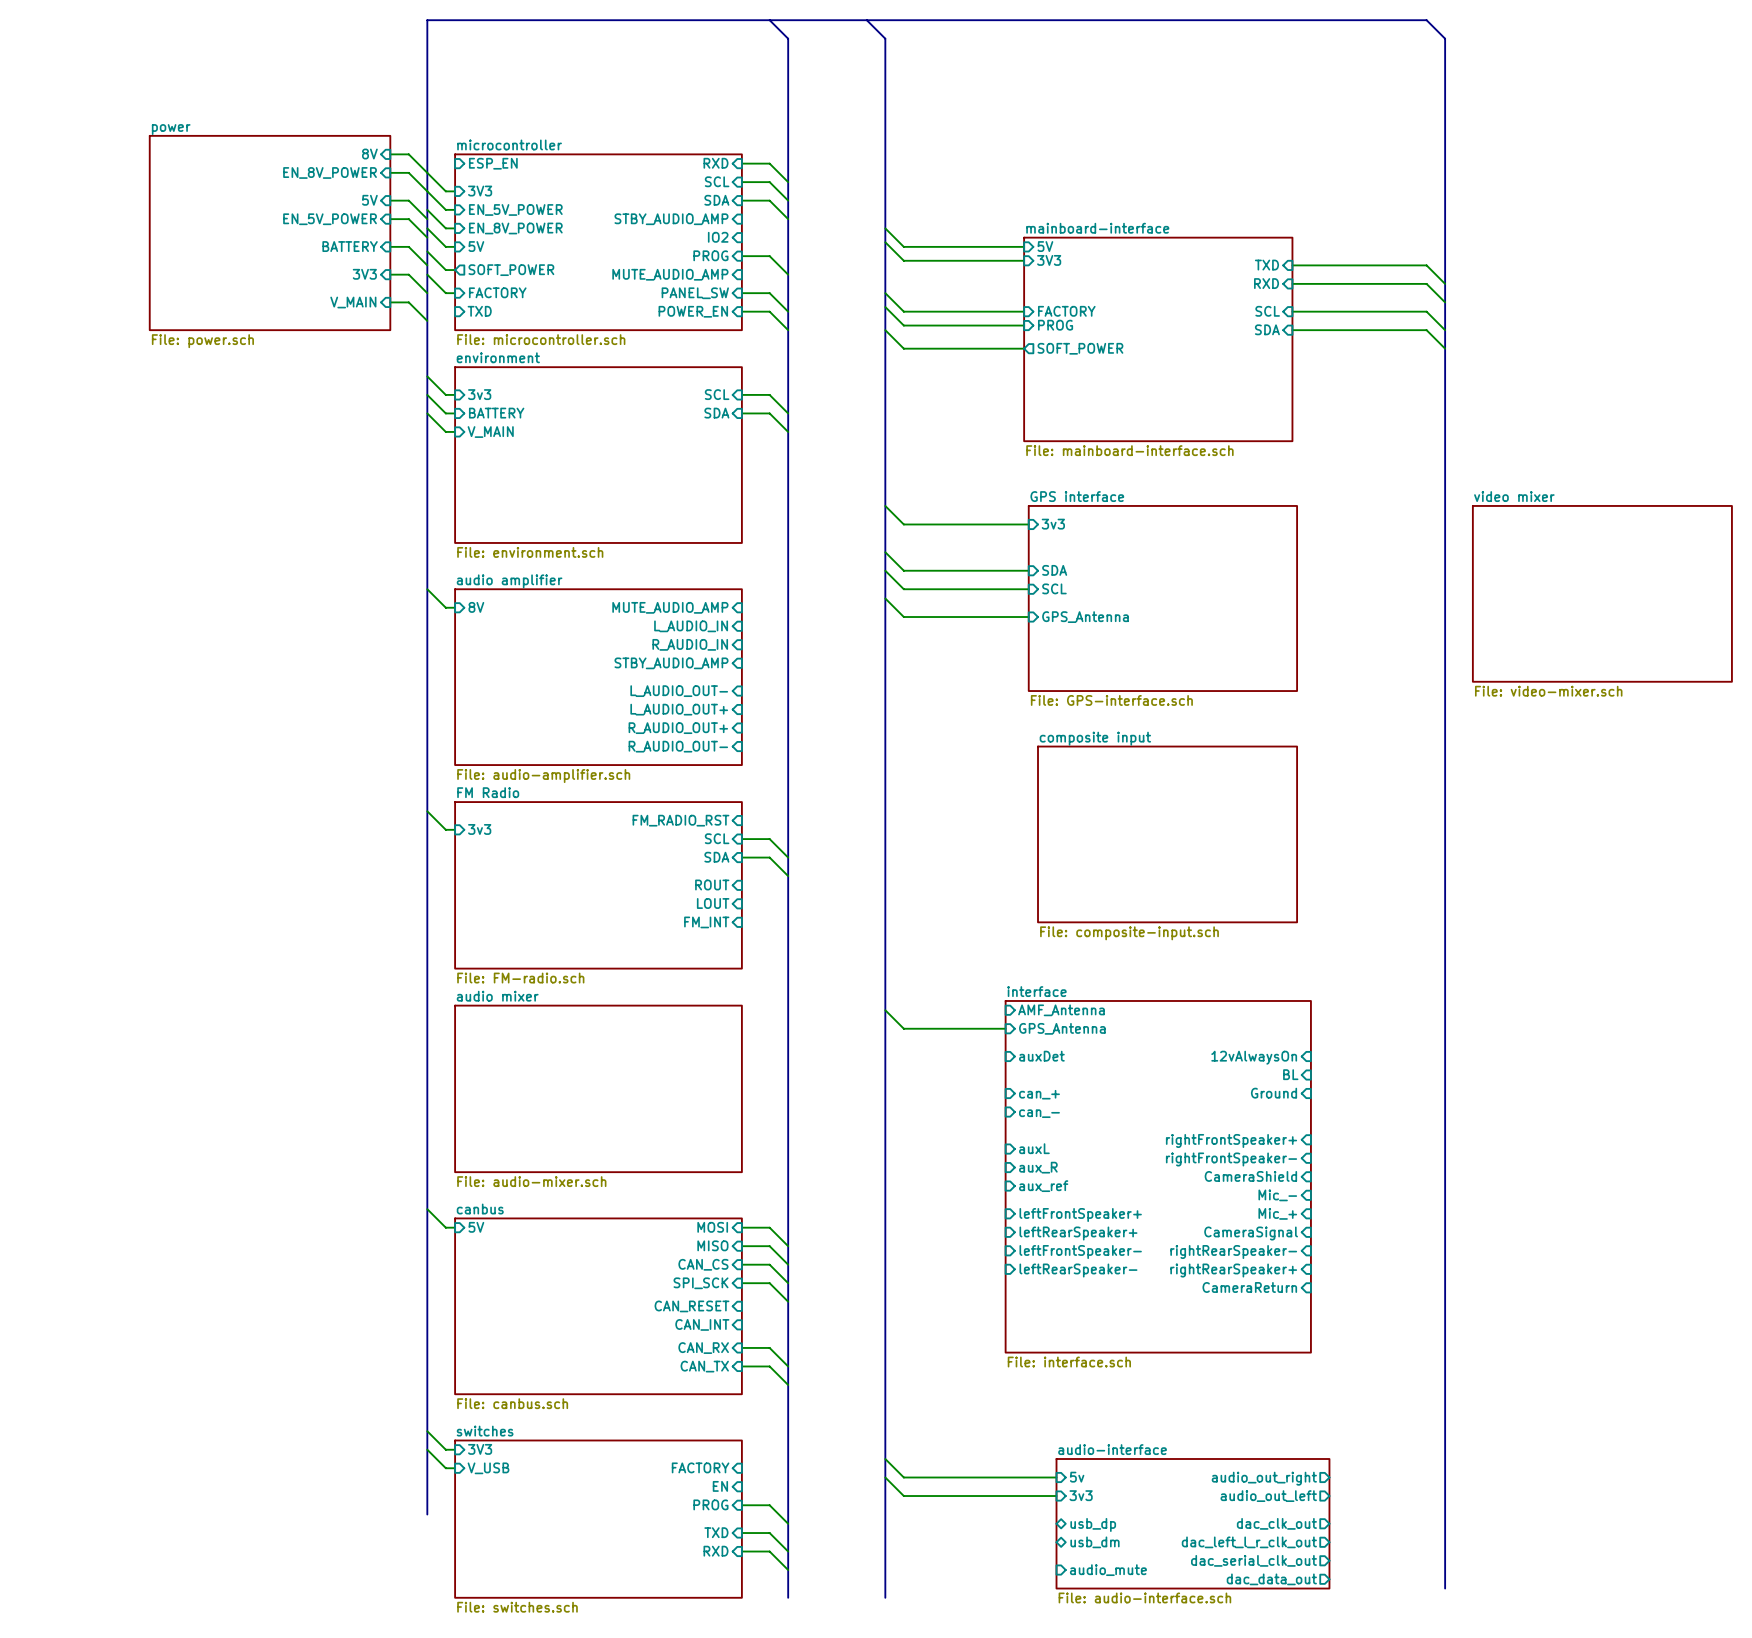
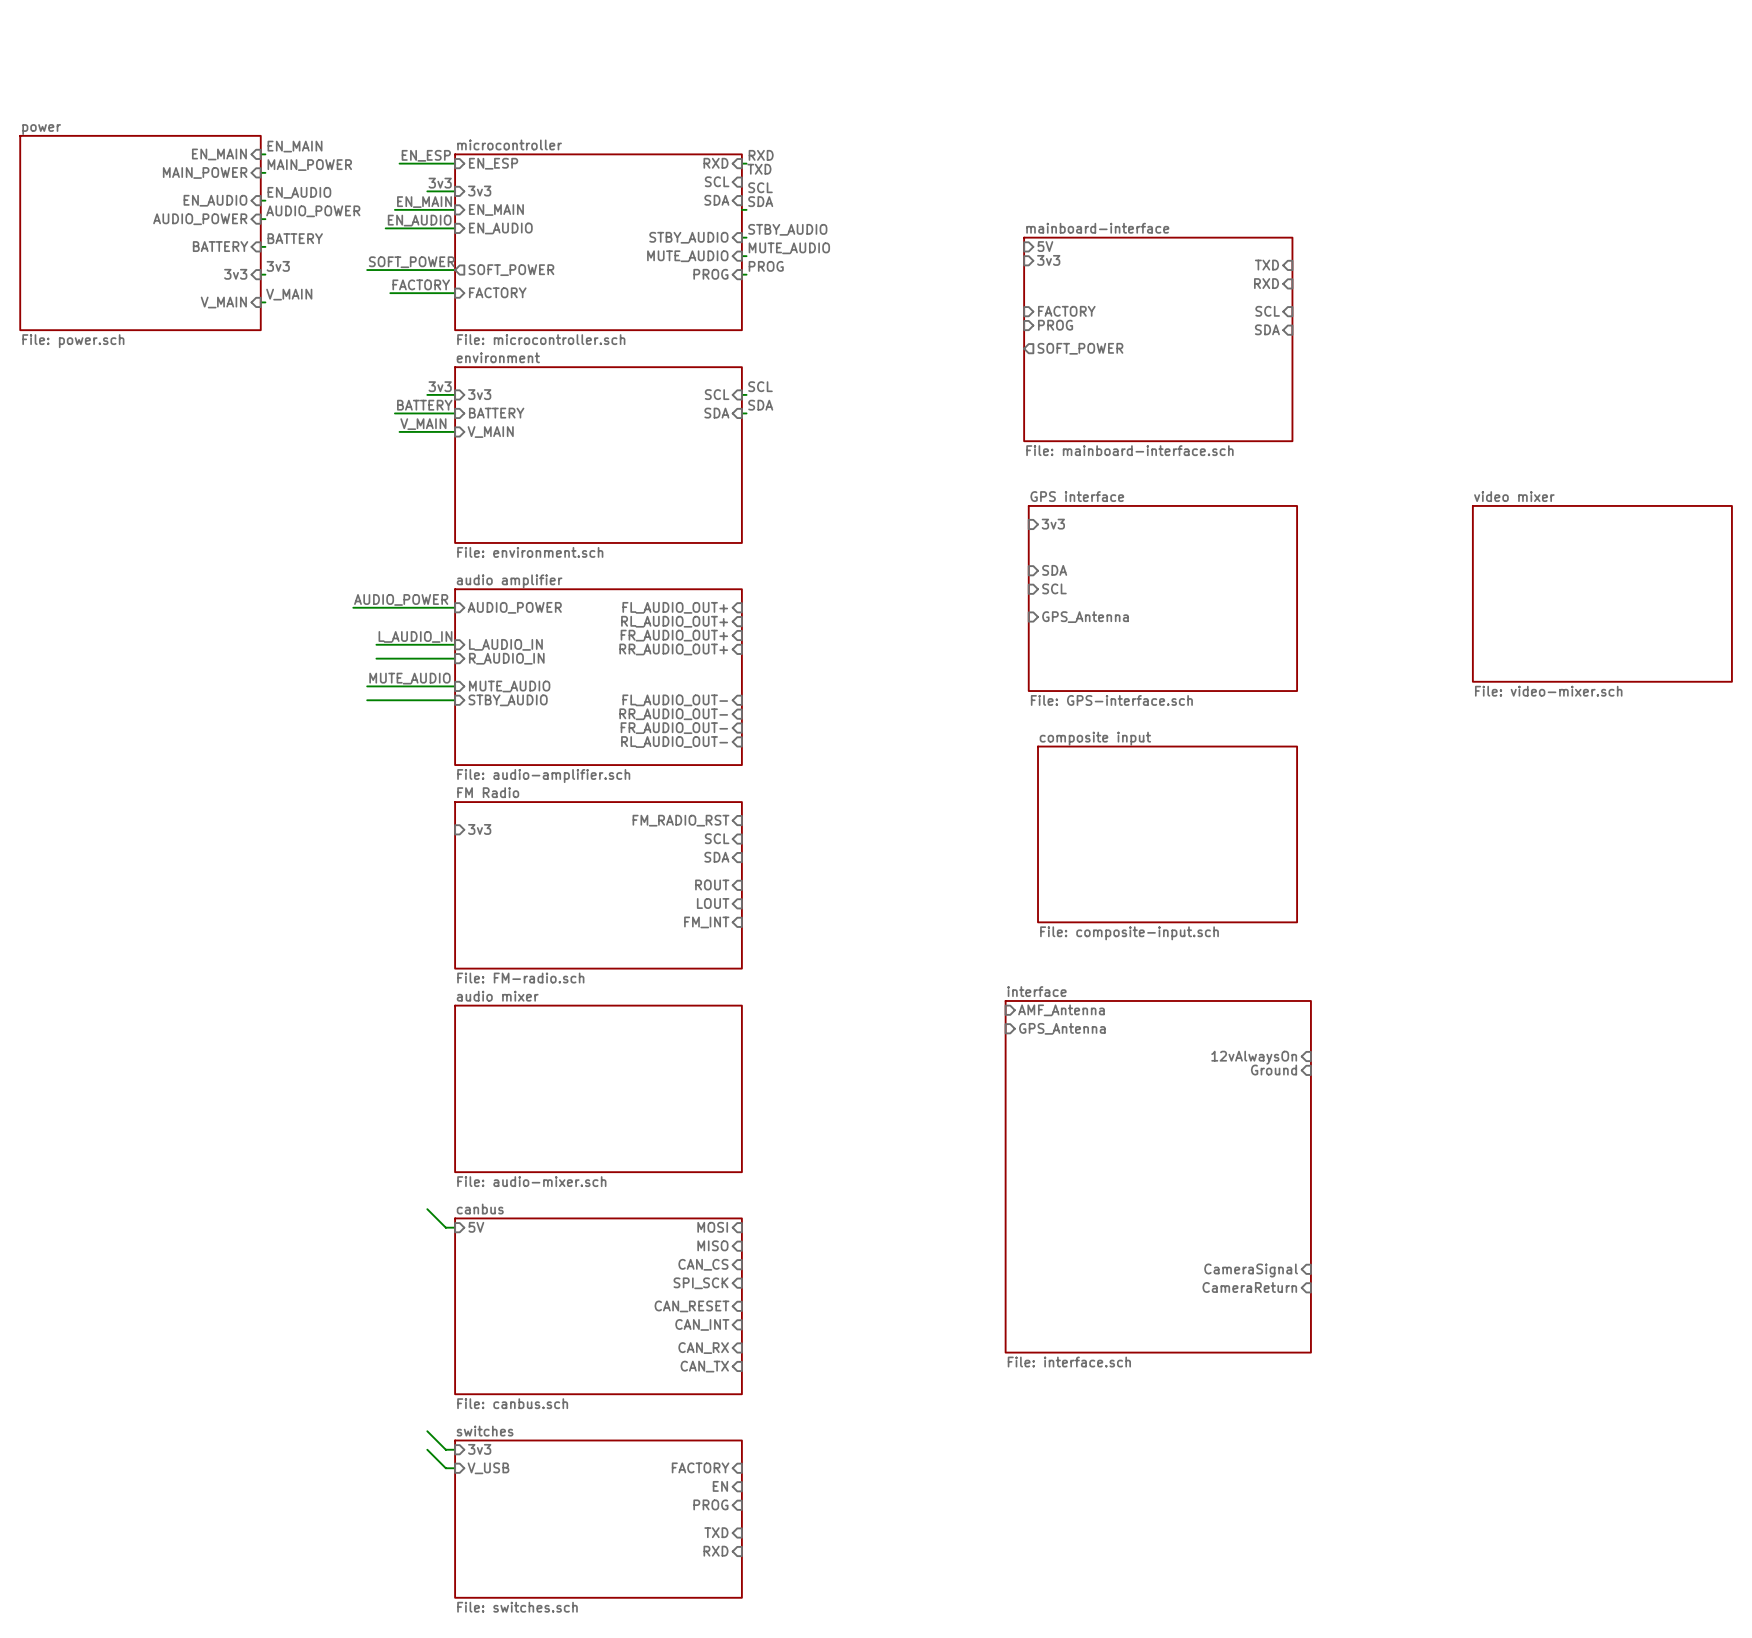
bus: (769, 20) (788, 38) (788, 1597) -> none
bus: (866, 20) (885, 38) (885, 1597) -> none
label: none -> EN_MAIN (294, 146)
sheet pin: none -> EN_MAIN (219, 154)
wire: none -> (260, 154) (265, 154)
sheet pin: 8V (369, 154) -> none
wire: (390, 154) (408, 154) (445, 191) -> (427, 191) (445, 191)
label: none -> EN_ESP (426, 155)
label: none -> RXD (761, 155)
wire: none -> (399, 163) (455, 163)
sheet pin: ESP_EN (493, 163) -> EN_ESP (493, 163)
wire: (746, 163) (769, 163) (788, 182) -> none
label: none -> MAIN_POWER (309, 165)
label: none -> TXD (759, 169)
sheet pin: none -> MAIN_POWER (205, 172)
wire: none -> (260, 172) (265, 172)
sheet pin: EN_8V_POWER (330, 172) -> none
wire: (390, 172) (408, 172) (445, 209) -> (394, 209) (445, 209)
wire: (741, 182) (769, 182) (788, 200) -> none
label: none -> 3v3 (440, 183)
label: none -> SCL (760, 187)
sheet pin: 3V3 (480, 191) -> 3v3 (479, 191)
label: none -> EN_AUDIO (299, 192)
sheet pin: none -> EN_AUDIO (215, 200)
wire: none -> (260, 200) (265, 200)
sheet pin: 5V (369, 200) -> none
wire: (390, 200) (408, 200) (427, 219) -> none
wire: (741, 200) (769, 200) (788, 219) -> none
label: none -> SDA (760, 201)
label: none -> EN_MAIN (424, 202)
wire: (427, 209) (445, 228) -> (385, 228) (445, 228)
sheet pin: EN_5V_POWER (515, 209) -> EN_MAIN (496, 209)
wire: none -> (741, 209) (746, 209)
label: none -> AUDIO_POWER (313, 211)
sheet pin: none -> AUDIO_POWER (200, 219)
wire: none -> (260, 219) (265, 219)
sheet pin: EN_5V_POWER (330, 219) -> none
wire: (390, 219) (408, 219) (427, 237) -> none
sheet pin: STBY_AUDIO_AMP (671, 219) -> none
label: none -> EN_AUDIO (419, 220)
wire: (427, 228) (445, 246) (455, 246) -> none
sheet pin: EN_8V_POWER (515, 228) -> EN_AUDIO (500, 228)
wire: (885, 228) (903, 246) (1024, 246) -> none
label: none -> STBY_AUDIO (787, 229)
sheet power position: (270, 233) -> (140, 233)
sheet pin: IO2 (718, 237) -> STBY_AUDIO (688, 237)
wire: none -> (741, 237) (746, 237)
label: none -> BATTERY (295, 238)
wire: (885, 242) (903, 260) (1024, 260) -> none
wire: none -> (260, 246) (265, 246)
sheet pin position: BATTERY (350, 246) -> BATTERY (220, 246)
wire: (390, 246) (408, 246) (427, 265) -> none
sheet pin: 5V (476, 246) -> none
label: none -> MUTE_AUDIO (789, 248)
wire: (427, 251) (445, 270) -> (367, 270) (445, 270)
sheet pin: PROG (710, 255) -> MUTE_AUDIO (687, 256)
wire: (746, 256) (769, 256) (788, 274) -> none
sheet pin: 3V3 (1049, 260) -> 3v3 (1048, 260)
label: none -> SOFT_POWER (411, 262)
wire: (1292, 265) (1426, 265) (1445, 283) -> none
label: none -> 3v3 (278, 266)
label: none -> PROG (766, 266)
sheet pin: none -> 3v3 (235, 274)
wire: none -> (260, 274) (265, 274)
sheet pin: 3V3 (364, 274) -> none
wire: (390, 274) (408, 274) (427, 293) -> none
wire: (427, 274) (445, 293) -> (390, 293) (445, 293)
sheet pin: MUTE_AUDIO_AMP (670, 274) -> PROG (710, 274)
wire: none -> (741, 274) (746, 274)
wire: (1292, 283) (1426, 283) (1445, 302) -> none
label: none -> FACTORY (421, 284)
sheet pin: PANEL_SW (695, 293) -> none
wire: (741, 293) (769, 293) (788, 311) -> none
wire: (885, 293) (903, 311) (1024, 311) -> none
label: none -> V_MAIN (289, 294)
wire: none -> (260, 302) (265, 302)
sheet pin position: V_MAIN (353, 302) -> V_MAIN (223, 302)
wire: (390, 302) (408, 302) (427, 320) -> none
wire: (885, 307) (903, 325) (1024, 325) -> none
sheet pin: TXD (479, 311) -> none
sheet pin: POWER_EN (693, 311) -> none
wire: (741, 311) (769, 311) (788, 330) -> none
wire: (1292, 311) (1426, 311) (1445, 330) -> none
wire: (885, 330) (903, 348) (1024, 348) -> none
wire: (1292, 330) (1426, 330) (1445, 348) -> none
wire: (427, 376) (445, 394) -> (427, 394) (445, 394)
label: none -> 3v3 (440, 386)
label: none -> SCL (760, 386)
wire: (427, 394) (445, 413) -> (394, 413) (445, 413)
wire: (746, 394) (769, 394) (788, 413) -> none
label: none -> BATTERY (424, 405)
label: none -> SDA (760, 405)
wire: (427, 413) (445, 431) -> (399, 431) (445, 431)
wire: (746, 413) (769, 413) (788, 431) -> none
label: none -> V_MAIN (423, 424)
wire: (885, 505) (903, 524) (1028, 524) -> none
wire: (885, 552) (903, 570) (1028, 570) -> none
wire: (885, 570) (903, 589) (1028, 589) -> none
wire: (427, 589) (445, 607) -> (353, 607) (445, 607)
wire: (885, 598) (903, 617) (1028, 617) -> none
label: none -> AUDIO_POWER (401, 599)
sheet pin: 8V (476, 607) -> AUDIO_POWER (514, 607)
sheet pin: MUTE_AUDIO_AMP (670, 607) -> FL_AUDIO_OUT+ (675, 607)
sheet pin: none -> RL_AUDIO_OUT+ (674, 621)
sheet pin: L_AUDIO_IN (691, 626) -> none
sheet pin: none -> FR_AUDIO_OUT+ (674, 635)
label: none -> L_AUDIO_IN (415, 636)
wire: none -> (376, 644) (455, 644)
sheet pin: none -> L_AUDIO_IN (505, 644)
sheet pin: R_AUDIO_IN (690, 644) -> none
sheet pin: none -> RR_AUDIO_OUT+ (673, 649)
wire: none -> (376, 658) (455, 658)
sheet pin: none -> R_AUDIO_IN (506, 658)
sheet pin: STBY_AUDIO_AMP (671, 663) -> none
label: none -> MUTE_AUDIO (409, 678)
wire: none -> (367, 686) (455, 686)
sheet pin: none -> MUTE_AUDIO (509, 686)
sheet pin: L_AUDIO_OUT- (679, 691) -> none
wire: none -> (367, 700) (455, 700)
sheet pin: none -> STBY_AUDIO (508, 700)
sheet pin: none -> FL_AUDIO_OUT- (675, 700)
sheet pin: L_AUDIO_OUT+ (679, 709) -> none
sheet pin: none -> RR_AUDIO_OUT- (673, 714)
sheet pin: R_AUDIO_OUT+ (678, 728) -> FR_AUDIO_OUT- (674, 728)
sheet pin: R_AUDIO_OUT- (678, 746) -> RL_AUDIO_OUT- (674, 742)
wire: (427, 811) (445, 829) (455, 829) -> none
wire: (741, 839) (769, 839) (788, 857) -> none
wire: (741, 857) (769, 857) (788, 876) -> none
wire: (885, 1010) (903, 1028) (1005, 1028) -> none
sheet pin: auxDet (1041, 1056) -> none
sheet pin: BL (1290, 1074) -> none
sheet pin position: Ground (1274, 1093) -> Ground (1274, 1070)
sheet pin: can_+ (1039, 1094) -> none
sheet pin: can_- (1039, 1113) -> none
sheet pin: rightFrontSpeaker+ (1231, 1140) -> none
sheet pin: auxL (1034, 1148) -> none
sheet pin: rightFrontSpeaker- (1231, 1159) -> none
sheet pin: aux_R (1038, 1167) -> none
sheet pin: CameraShield (1250, 1176) -> none
sheet pin: aux_ref (1043, 1186) -> none
sheet pin: Mic_- (1277, 1195) -> none
sheet pin: Mic_+ (1277, 1213) -> none
sheet pin: leftFrontSpeaker+ (1080, 1215) -> none
wire: (741, 1227) (769, 1227) (788, 1246) -> none
sheet pin: leftRearSpeaker+ (1078, 1233) -> none
sheet pin: CameraSignal (1251, 1233) -> none
wire: (741, 1246) (769, 1246) (788, 1264) -> none
sheet pin: leftFrontSpeaker- (1080, 1252) -> none
sheet pin: rightRearSpeaker- (1233, 1252) -> none
wire: (741, 1264) (769, 1264) (788, 1283) -> none
sheet pin: leftRearSpeaker- (1078, 1270) -> none
sheet pin: rightRearSpeaker+ (1233, 1270) -> CameraSignal (1251, 1270)
wire: (741, 1283) (769, 1283) (788, 1301) -> none
wire: (741, 1347) (769, 1347) (788, 1366) -> none
wire: (741, 1366) (769, 1366) (788, 1384) -> none
sheet pin: 3V3 (480, 1449) -> 3v3 (479, 1449)
wire: (885, 1459) (903, 1477) (1056, 1477) -> none
wire: (885, 1477) (903, 1496) (1056, 1496) -> none
sheet pin: 5v (1077, 1477) -> none
sheet pin: audio_out_right (1264, 1478) -> none
sheet pin: 3v3 (1081, 1495) -> none
sheet pin: audio_out_left (1268, 1496) -> none
wire: (741, 1505) (769, 1505) (788, 1523) -> none
bus: (427, 1514) (427, 20) (1426, 20) (1445, 38) (1445, 1588) -> none
sheet audio-interface: File: audio-interface.sch (1192, 1523) -> none
sheet pin: dac_clk_out (1276, 1523) -> none
sheet pin: usb_dp (1093, 1524) -> none
wire: (741, 1533) (769, 1533) (788, 1551) -> none
sheet pin: usb_dm (1094, 1542) -> none
sheet pin: dac_left_l_r_clk_out (1249, 1542) -> none
wire: (741, 1551) (769, 1551) (788, 1570) -> none
sheet pin: dac_serial_clk_out (1253, 1560) -> none
sheet pin: audio_mute (1108, 1570) -> none
sheet pin: dac_data_out (1271, 1579) -> none

